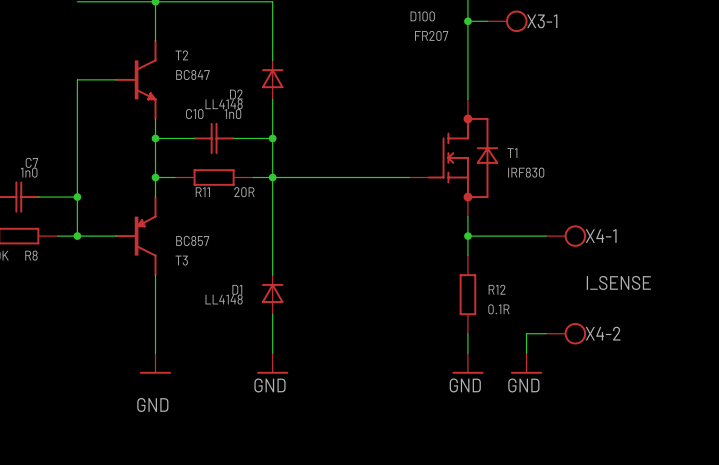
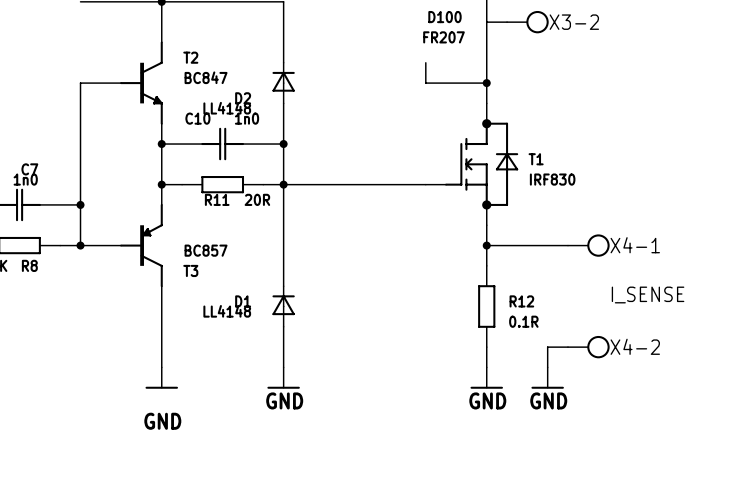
junction: (467, 21) -> none
X3-1 name: X3-1 (542, 21) -> X3-2 (574, 22)
wire: none -> (425, 62) (425, 83) (486, 83)
junction: none -> (486, 83)

